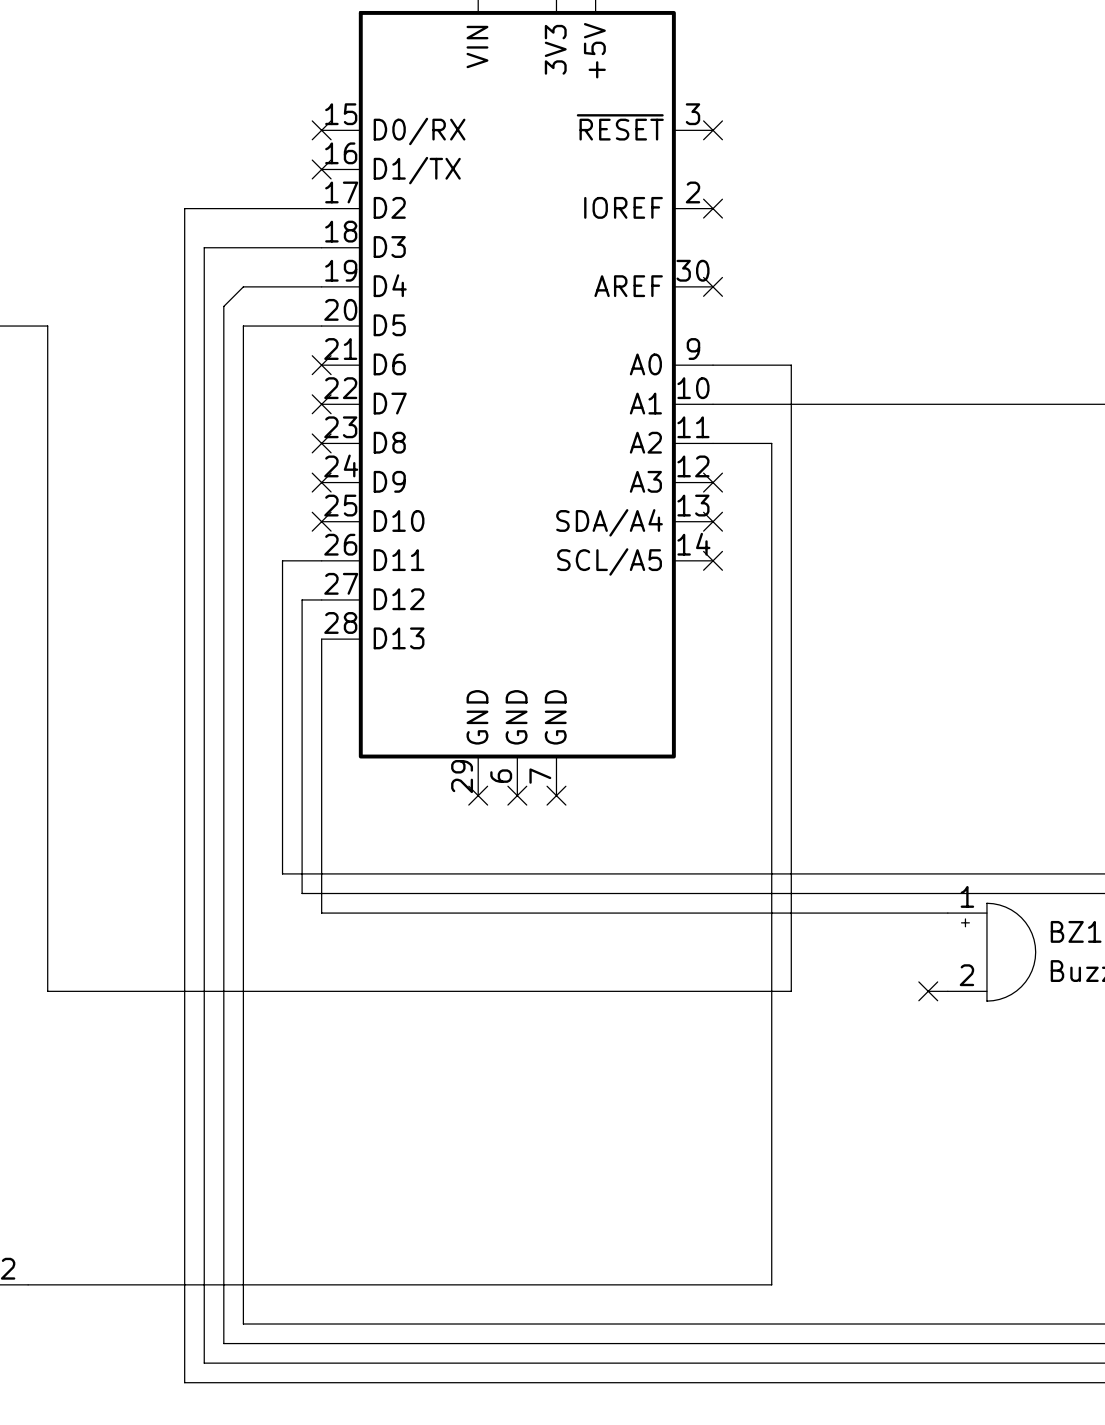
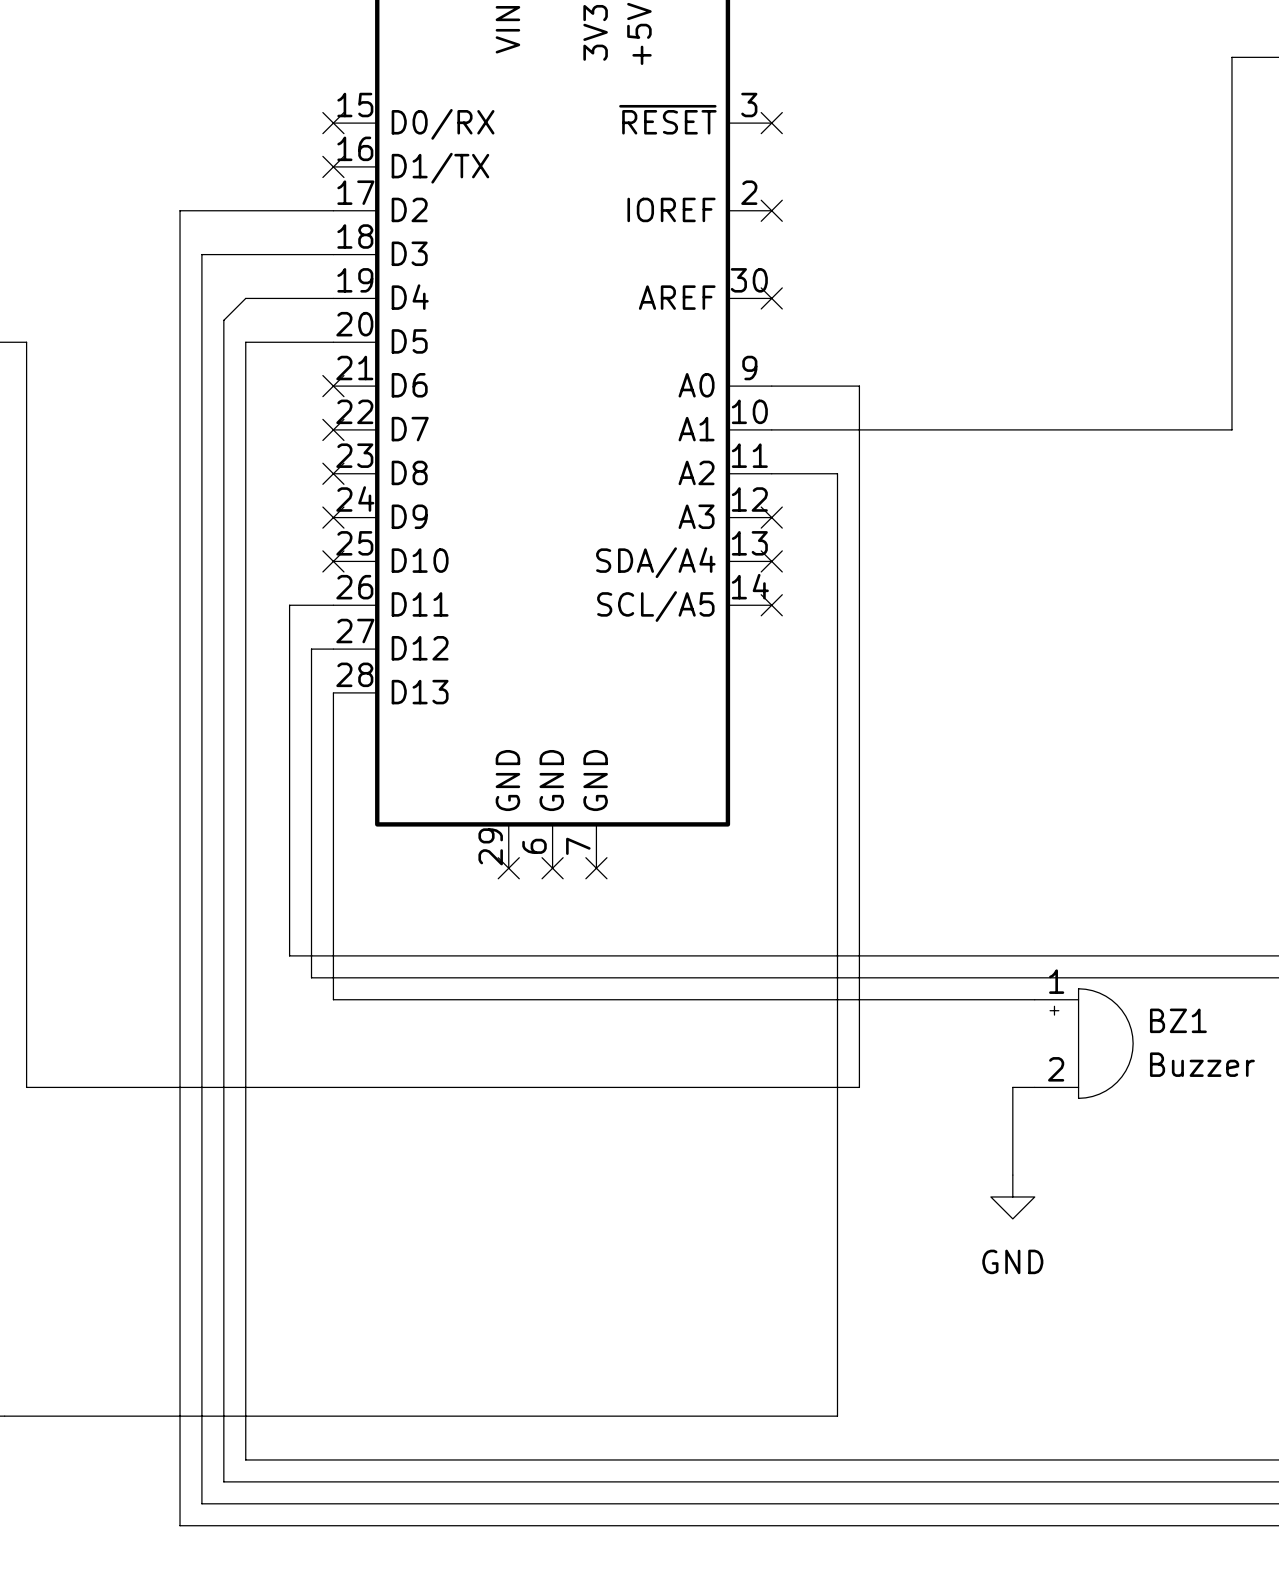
wire: none -> (1012, 1087) (1012, 1175)
no-connect mark: (928, 991) -> none
power symbol: none -> GND (1012, 1196)

